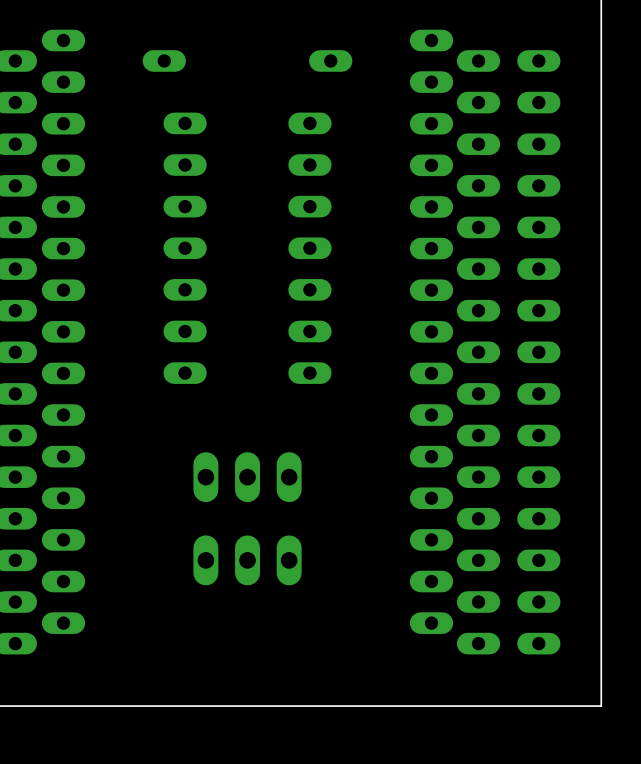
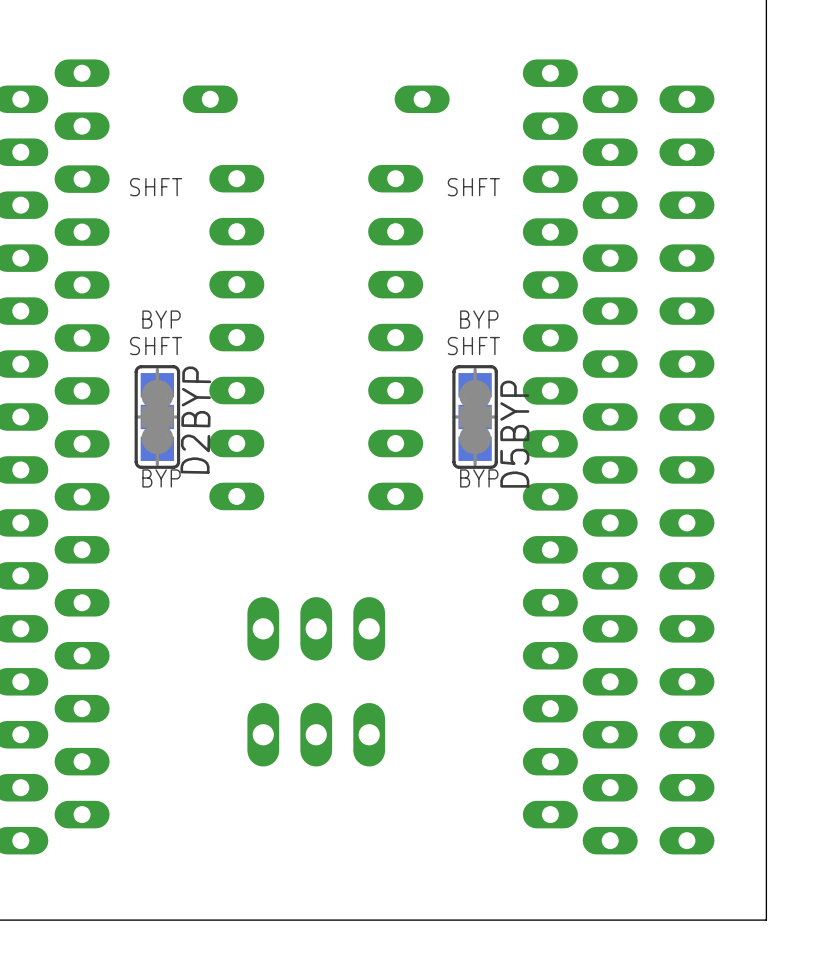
text: none -> SHFT (156, 187)
text: none -> SHFT (473, 187)
text: none -> BYP (161, 319)
text: none -> BYP (479, 319)
text: none -> SHFT (156, 346)
text: none -> SHFT (473, 346)
D2BYP: none -> (157, 417)
D5BYP: none -> (475, 417)
text: none -> BYP (161, 478)
text: none -> BYP (479, 478)

